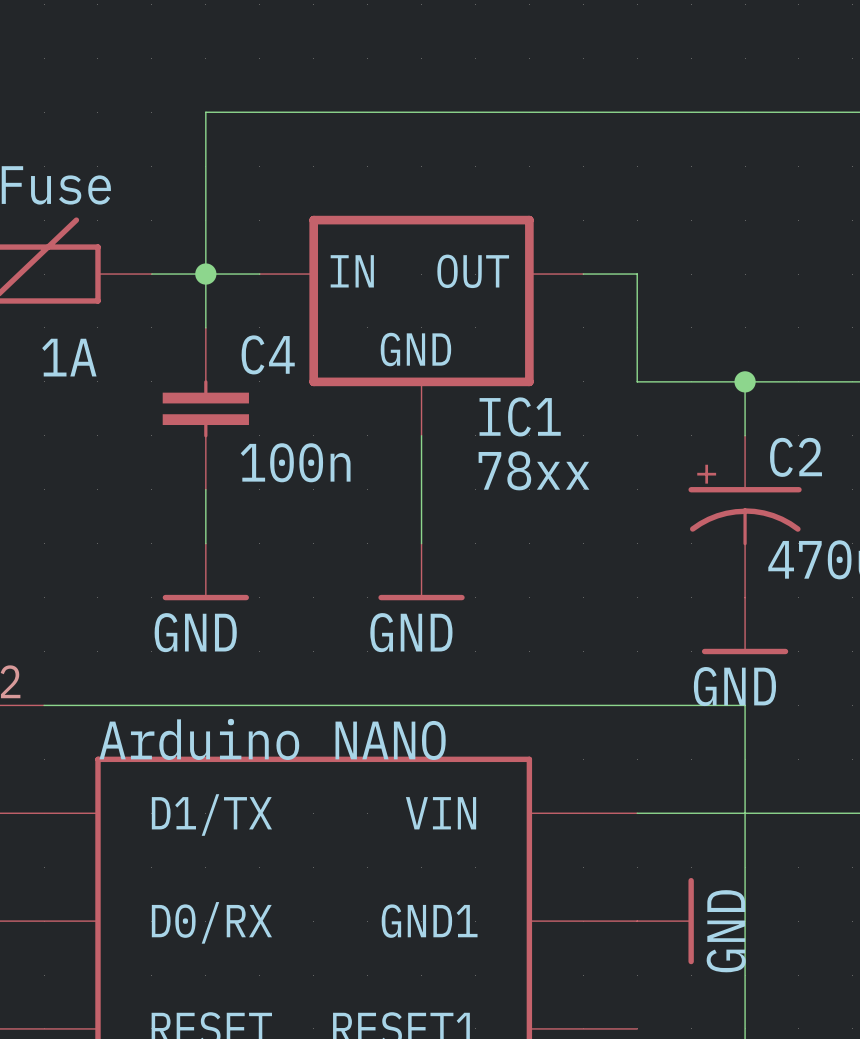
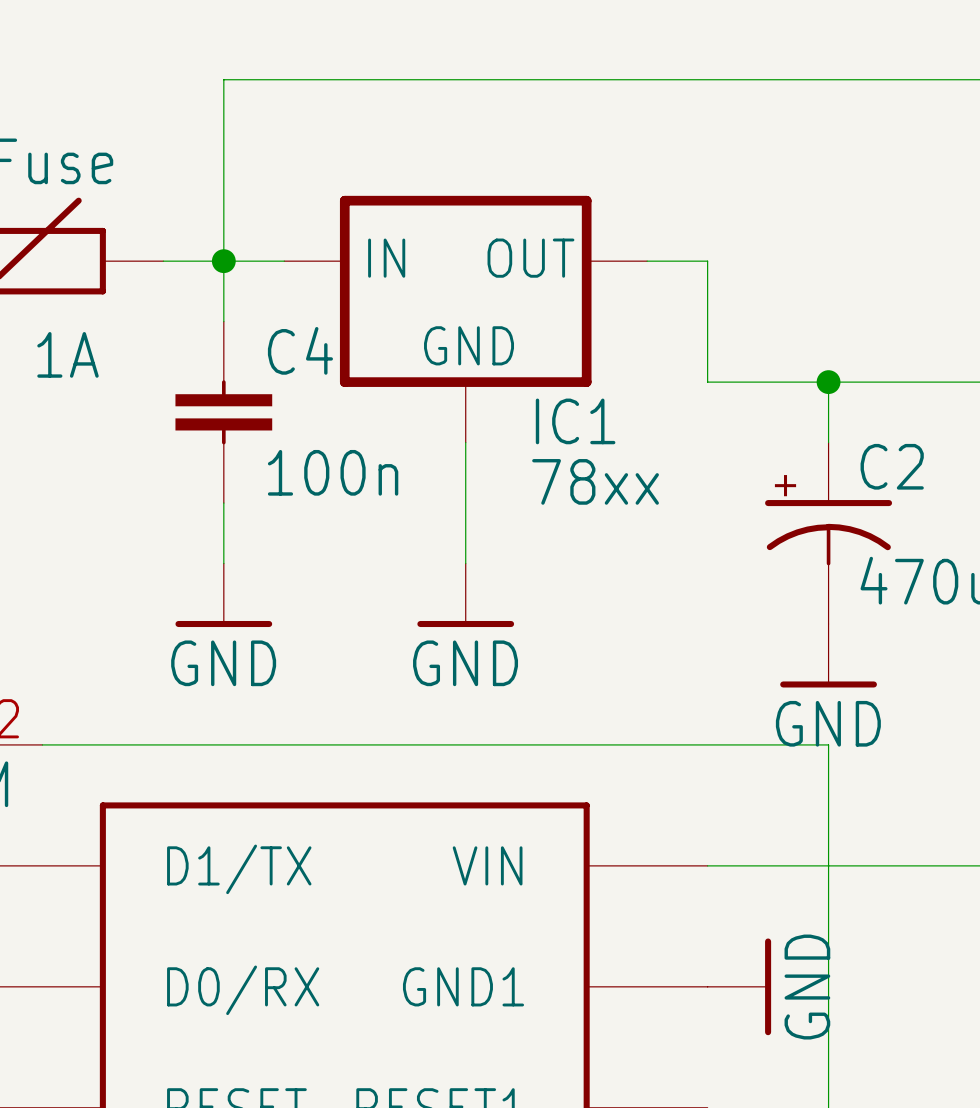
part text: Arduino NANO (272, 739) -> none

